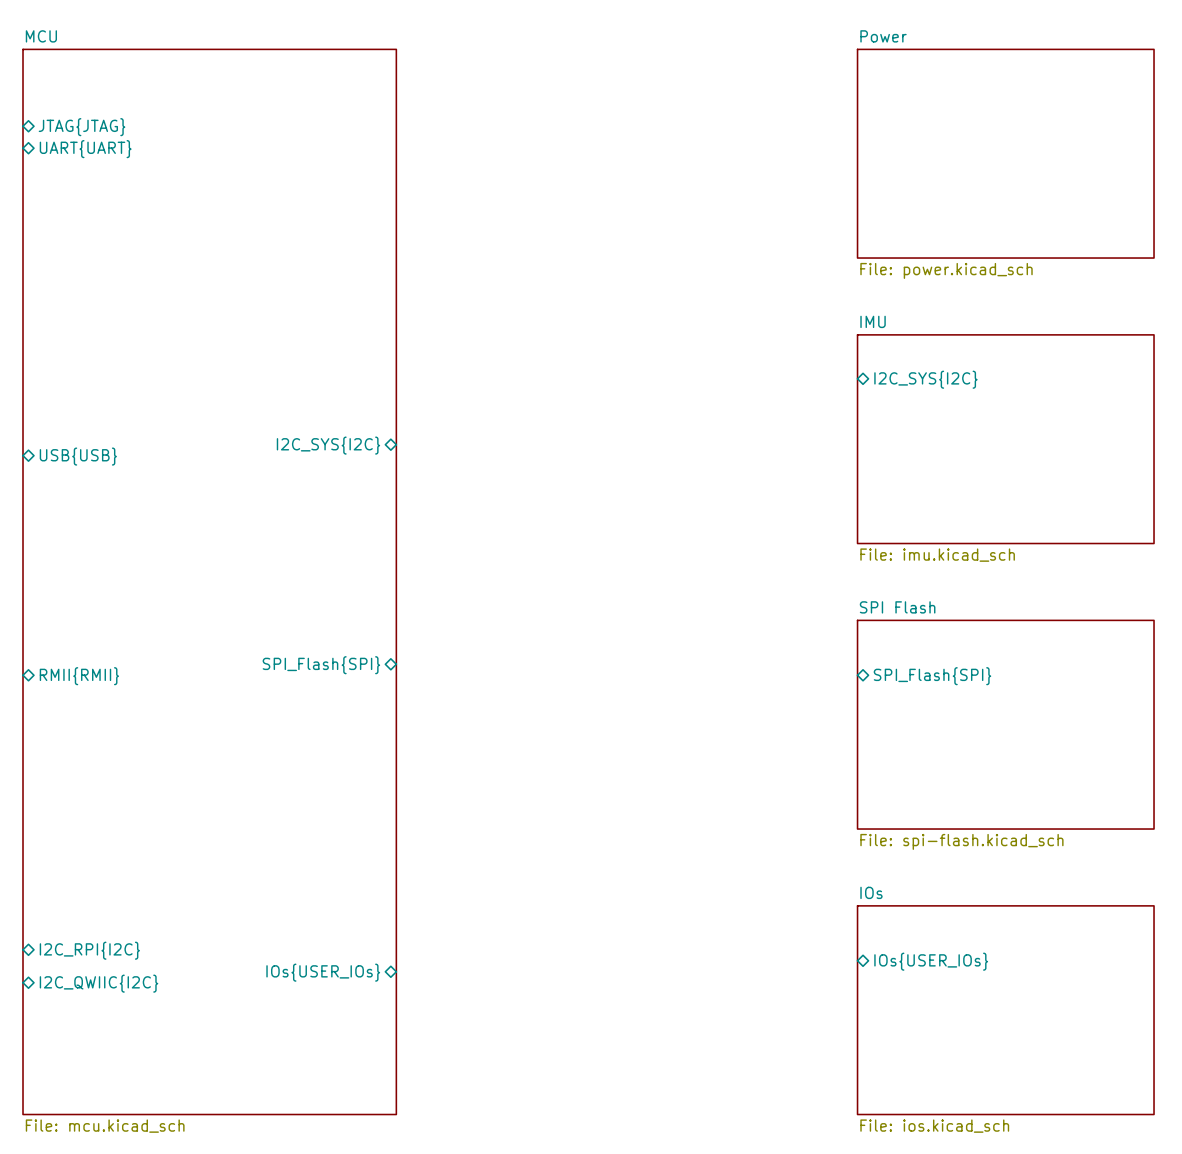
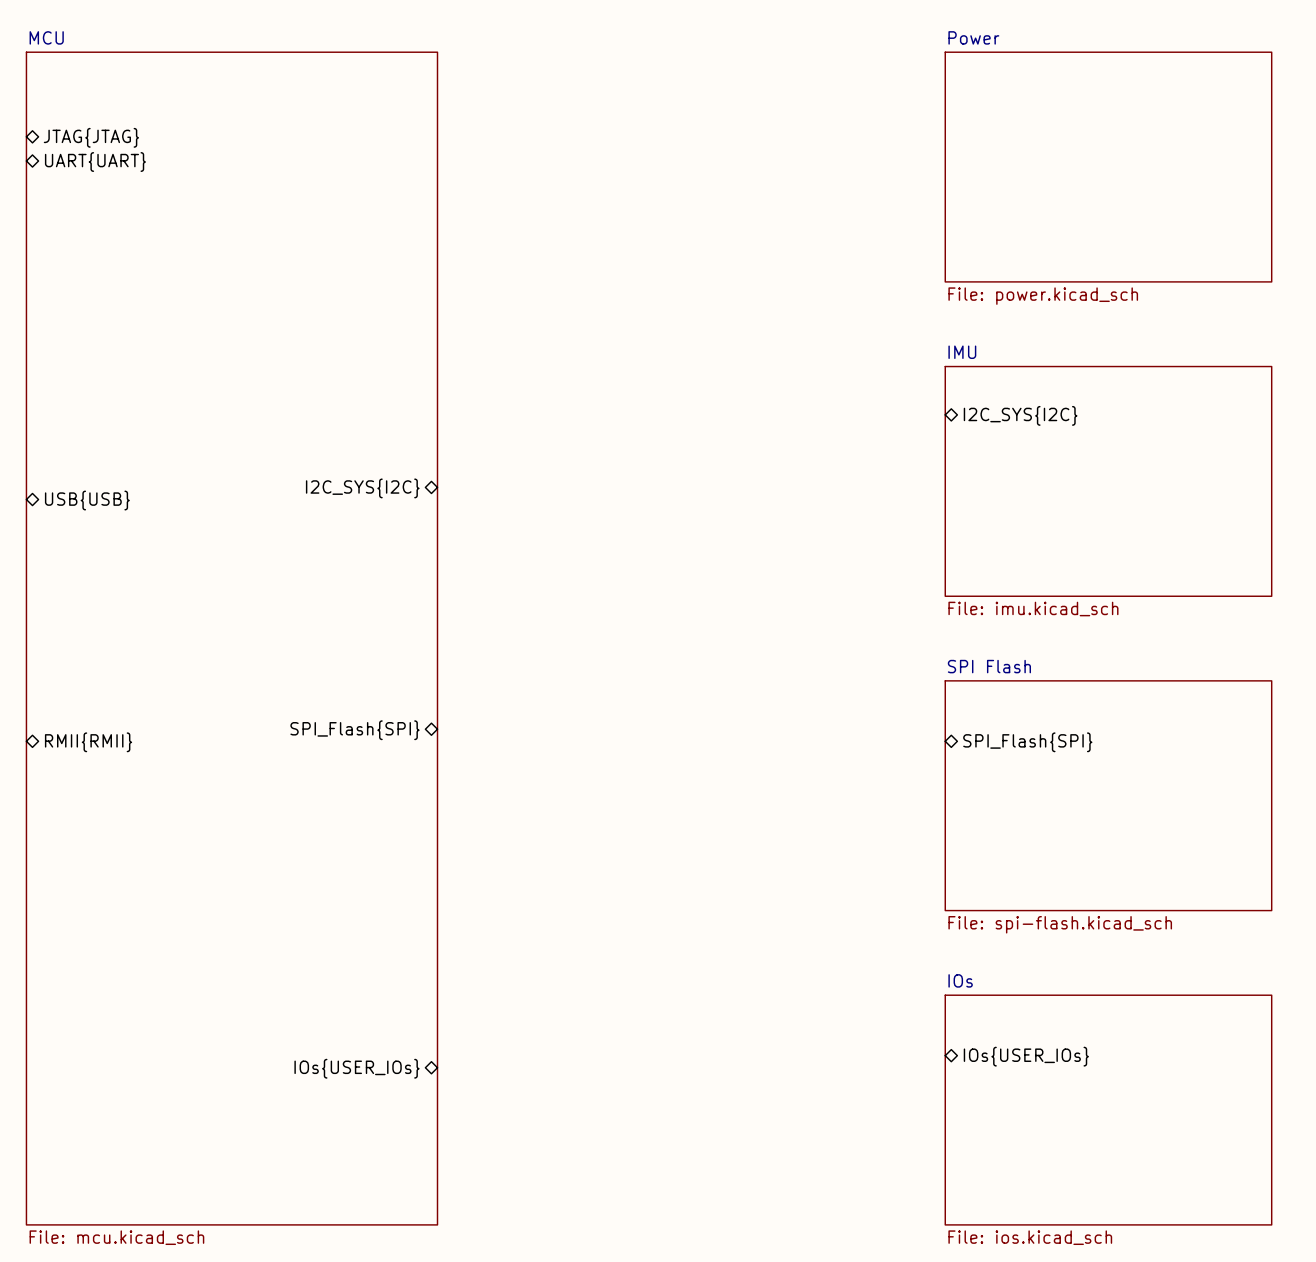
sheet pin: I2C_RPI{I2C} (89, 950) -> none
sheet pin: I2C_QWIIC{I2C} (98, 983) -> none

